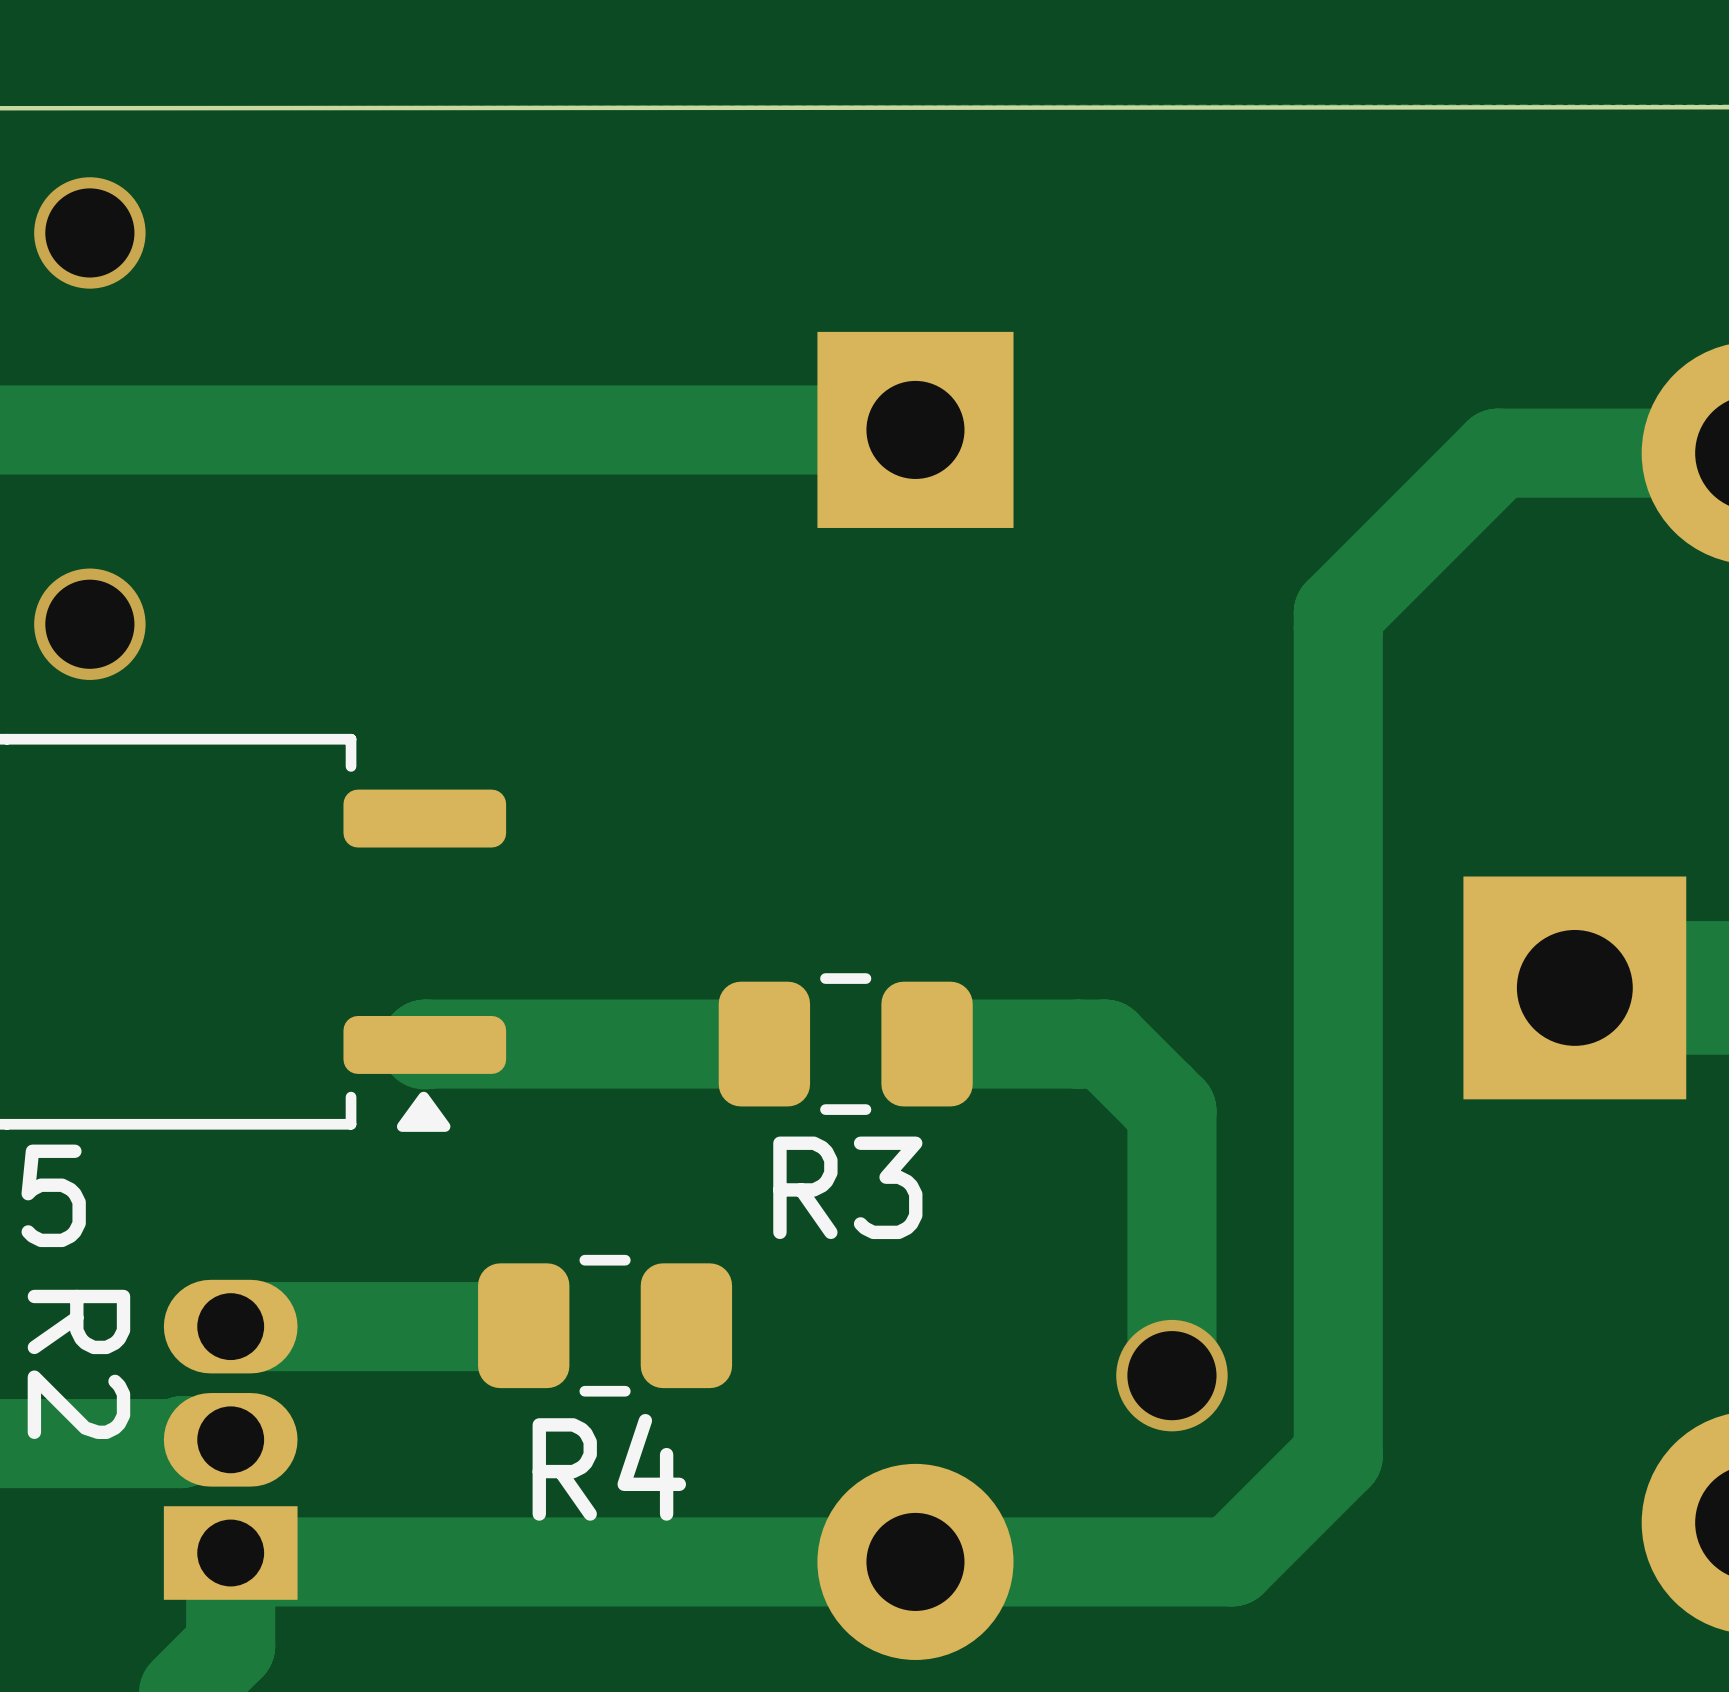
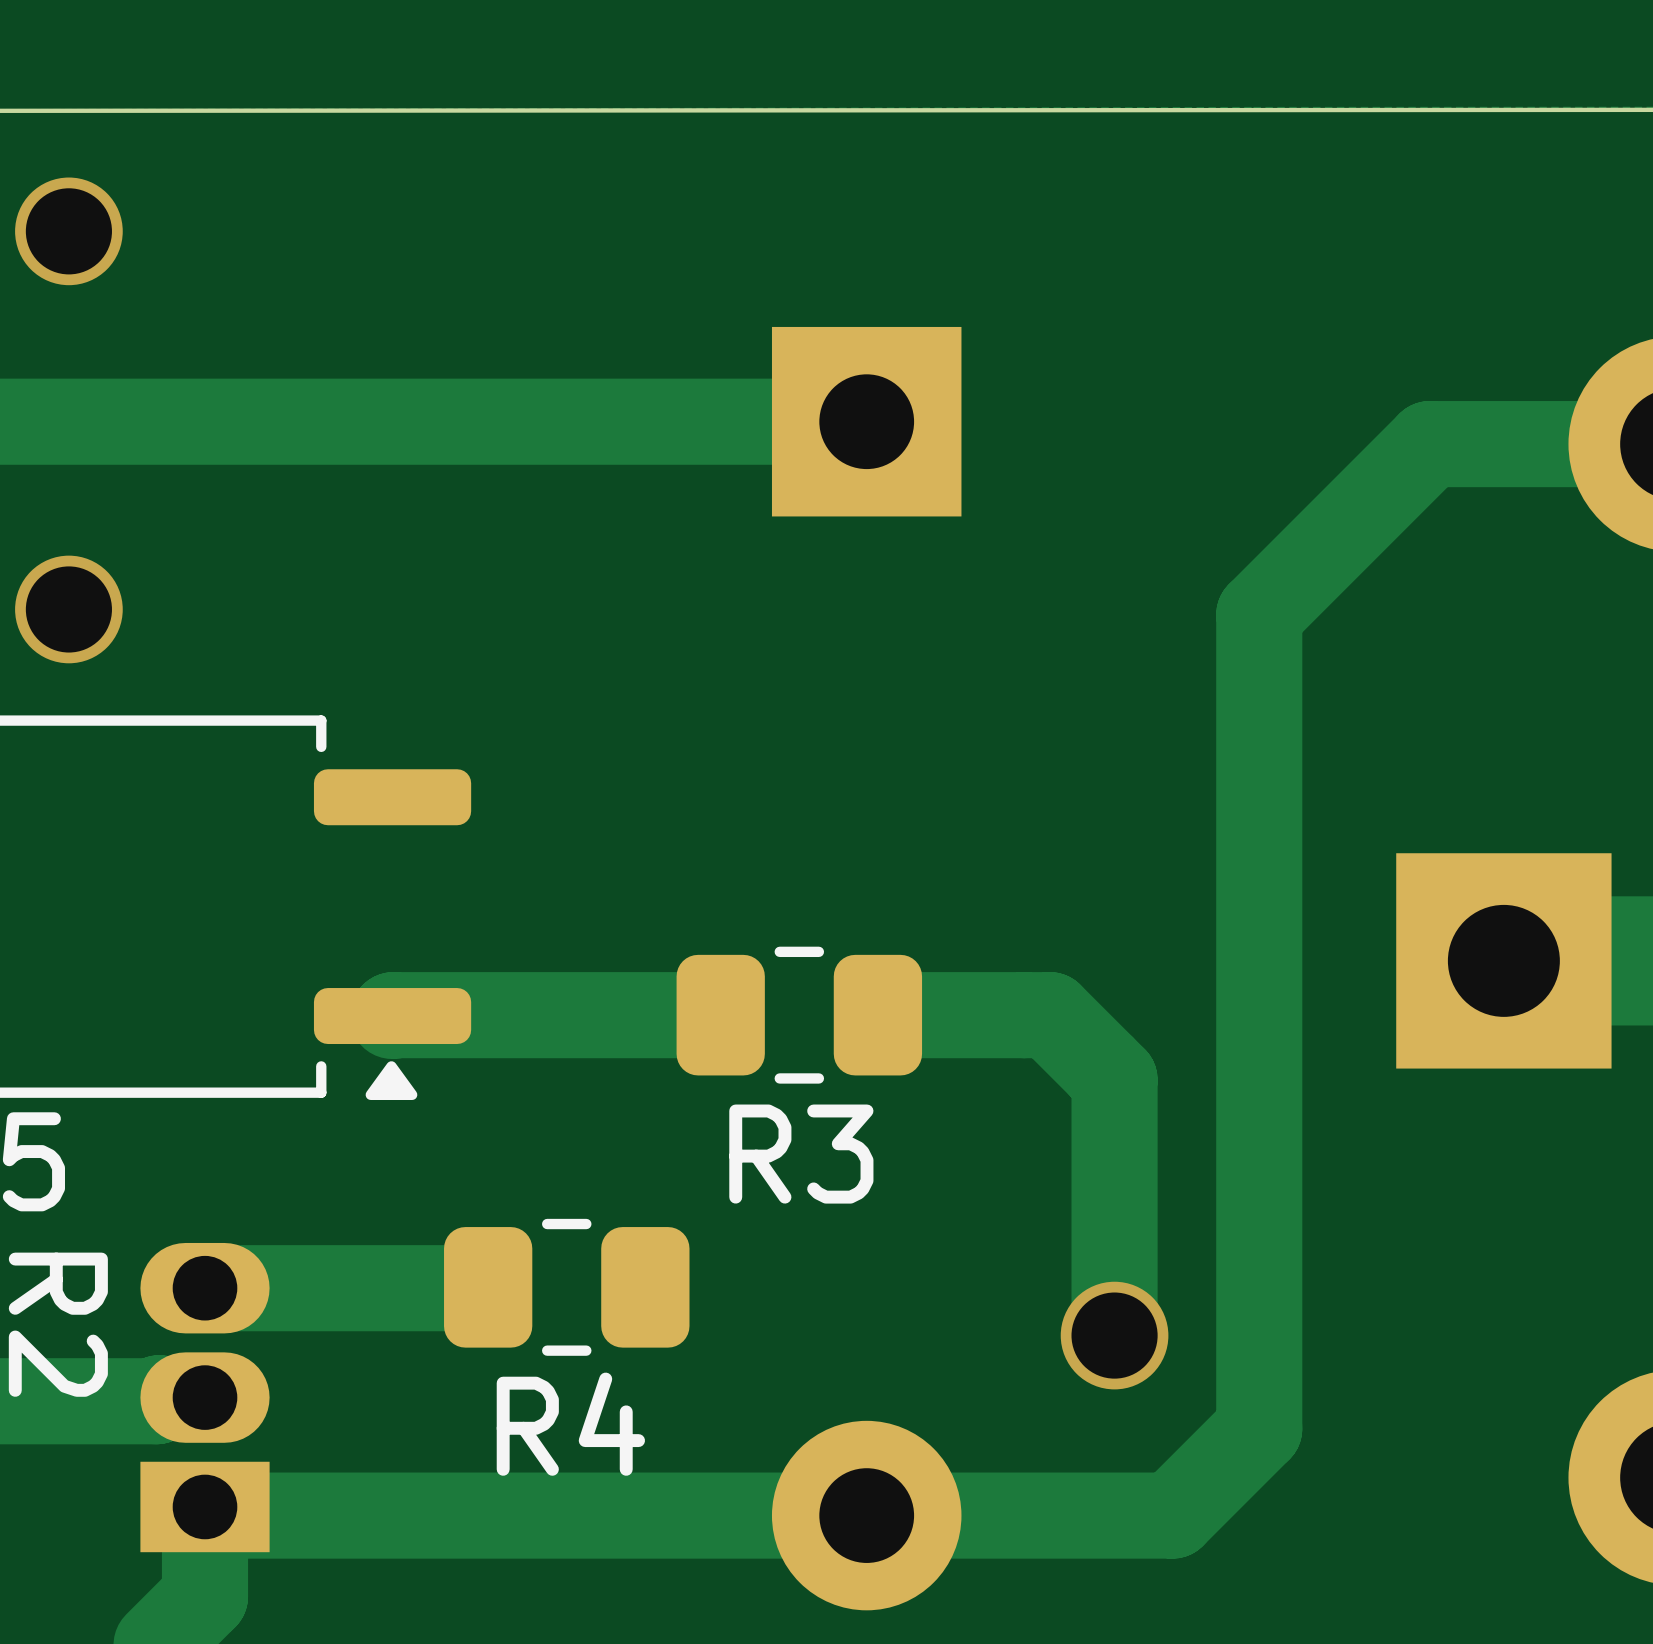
track: (1338, 613) (1338, 1455) (1321, 1472) -> (1275, 598) (1259, 614) (1259, 1428)

